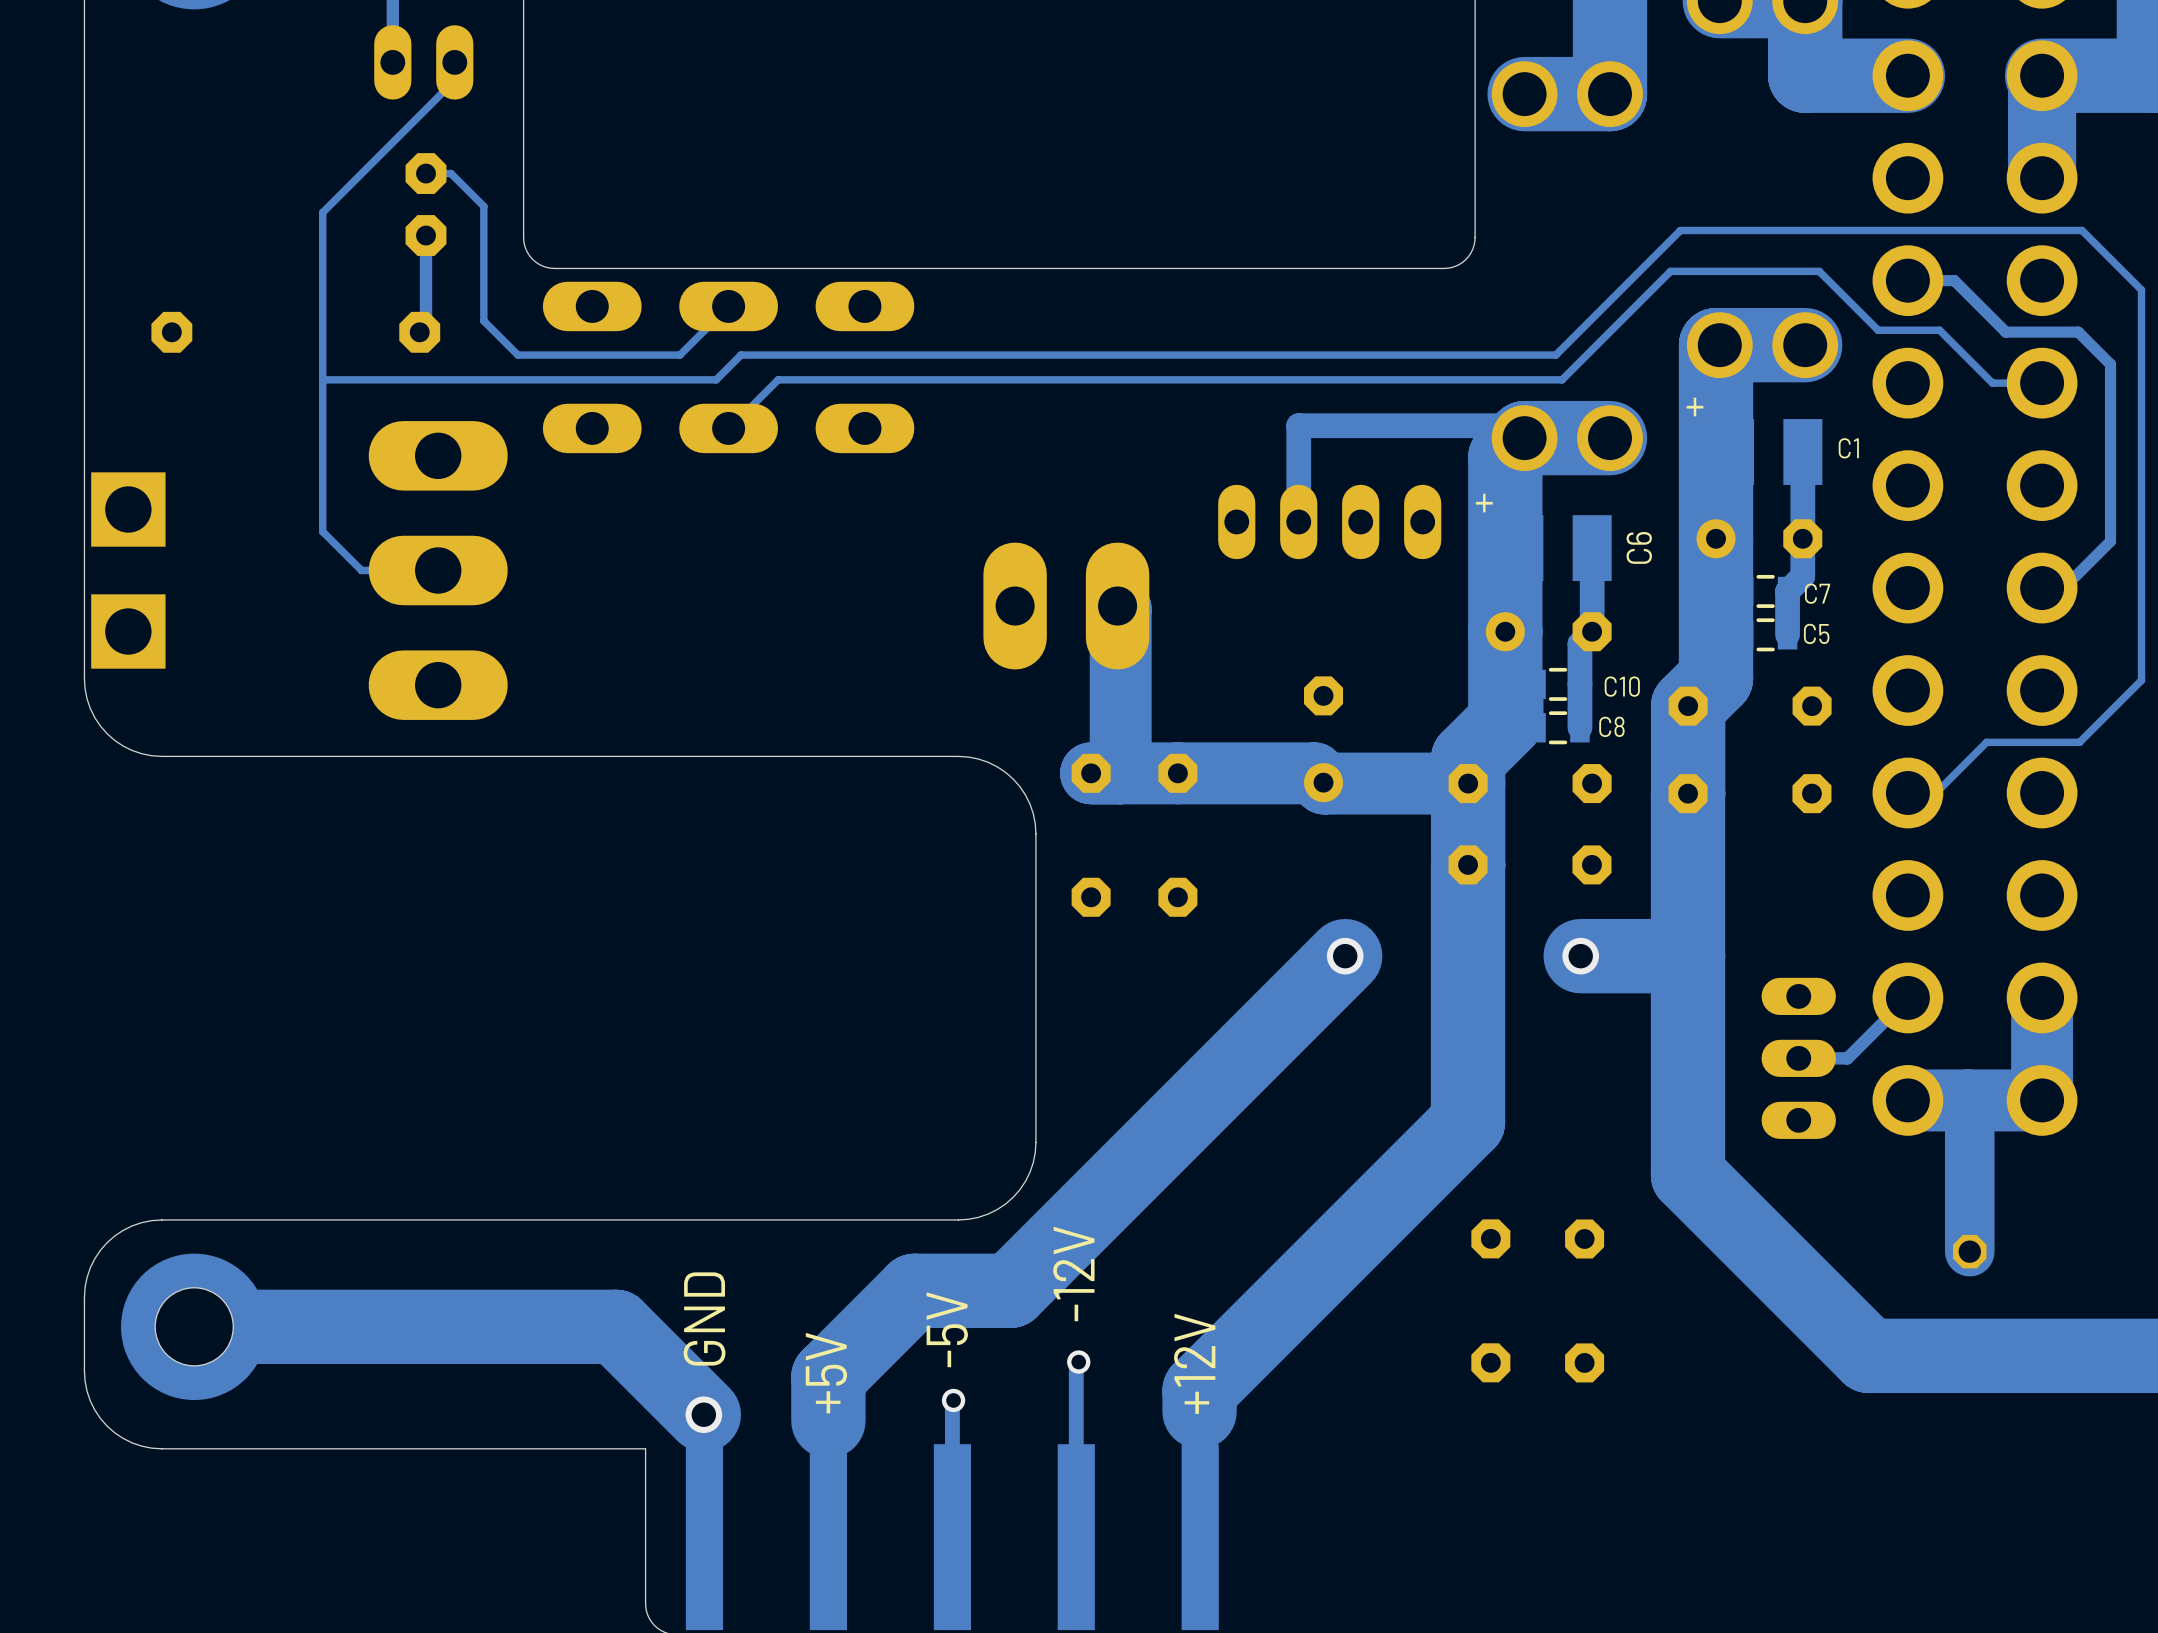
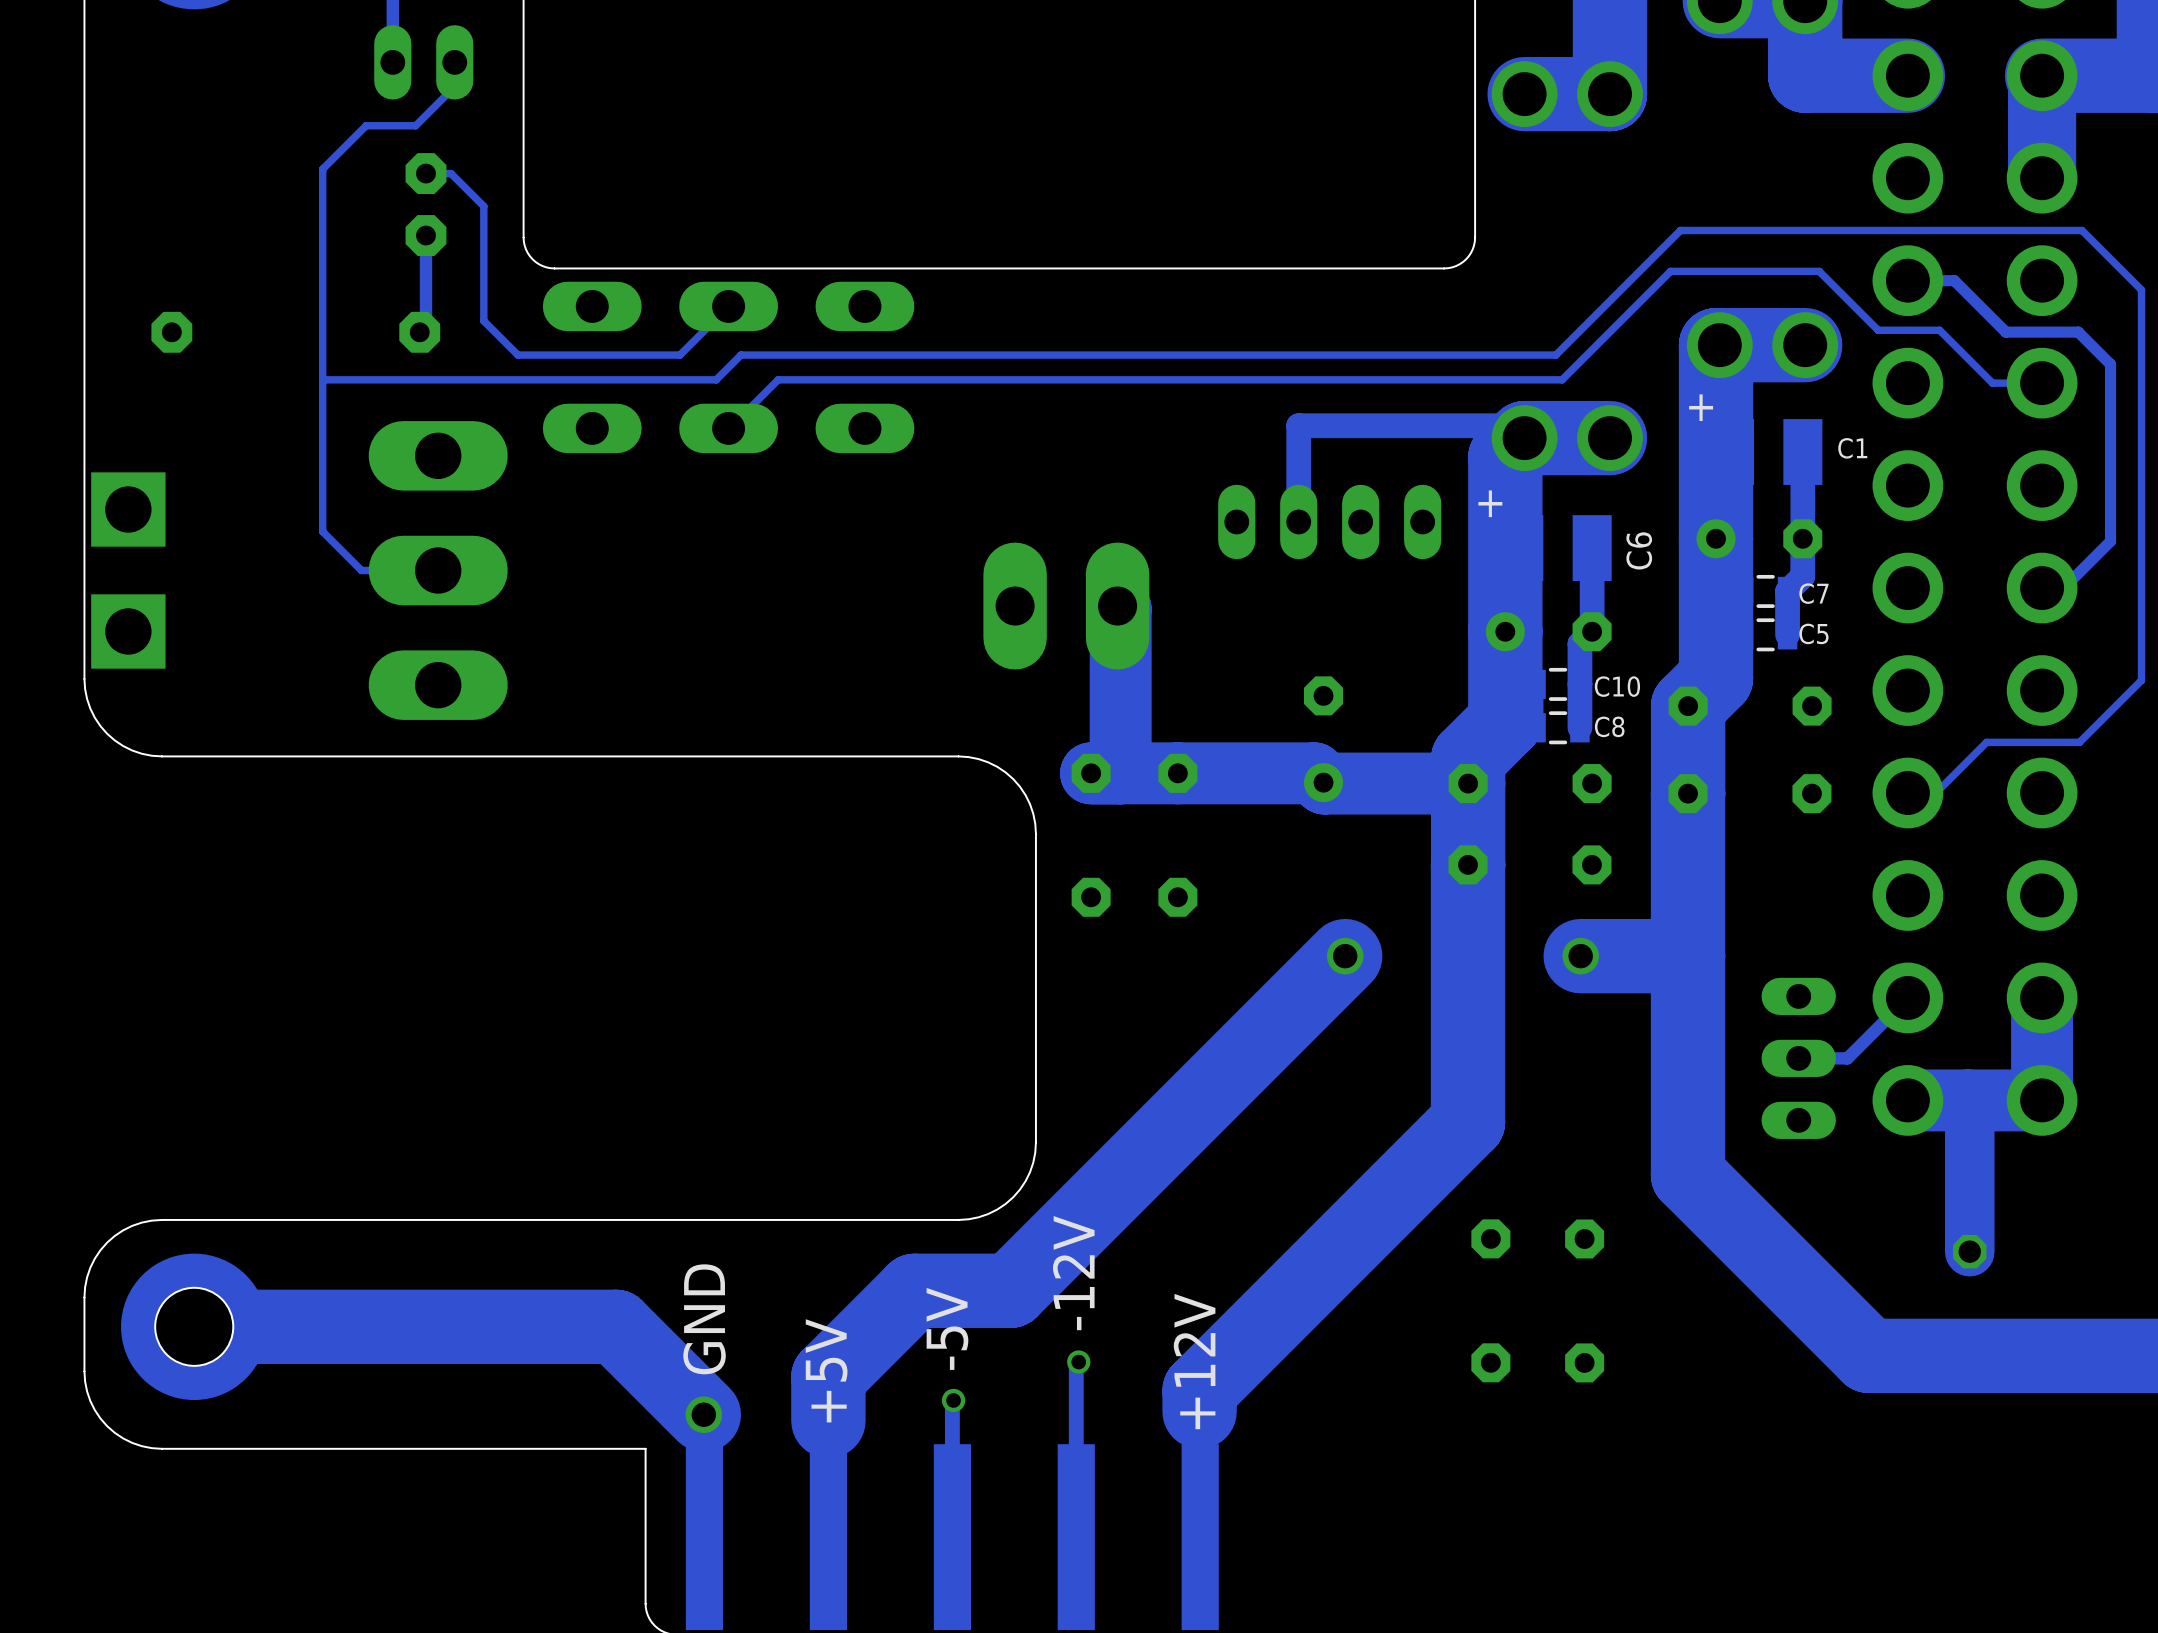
track: (454, 80) (322, 212) -> (454, 80) (454, 86) (415, 125) (366, 125) (322, 169) (322, 212)

